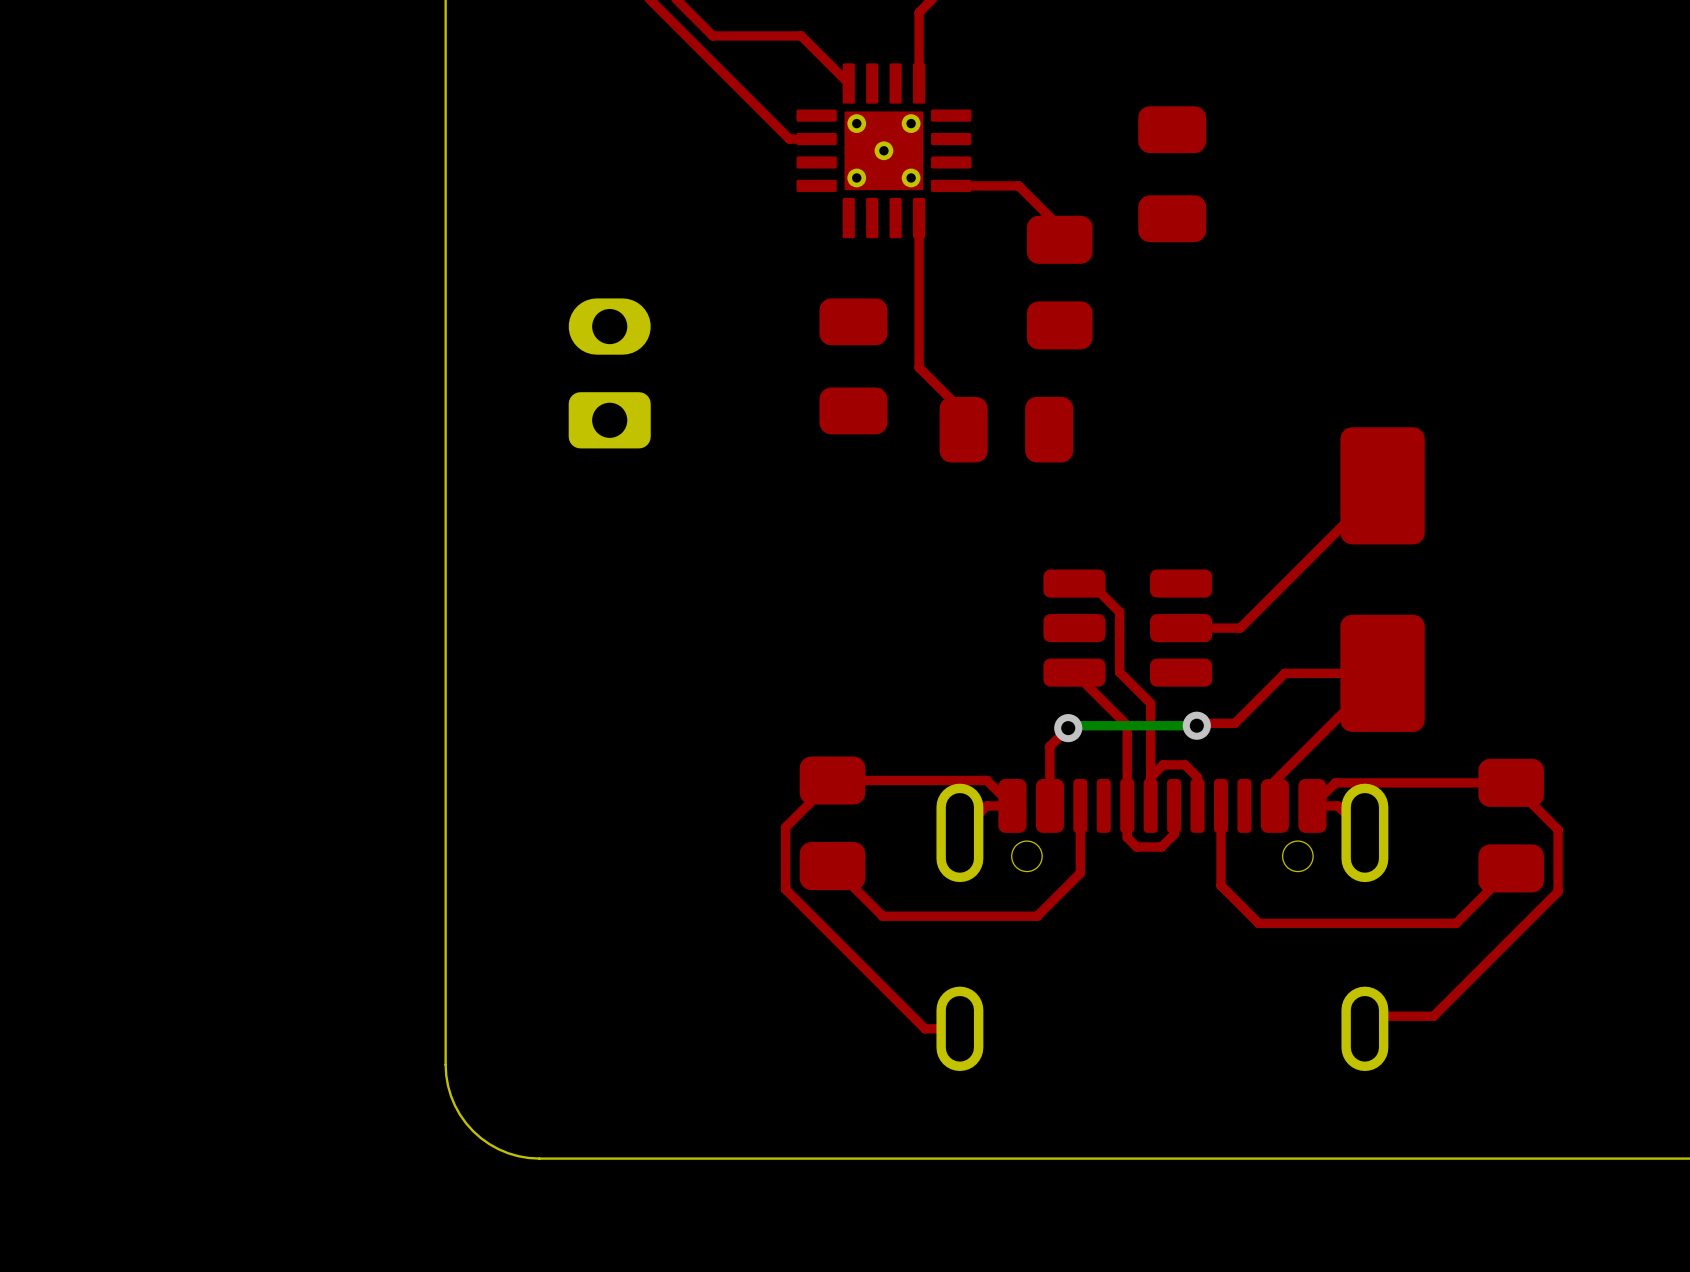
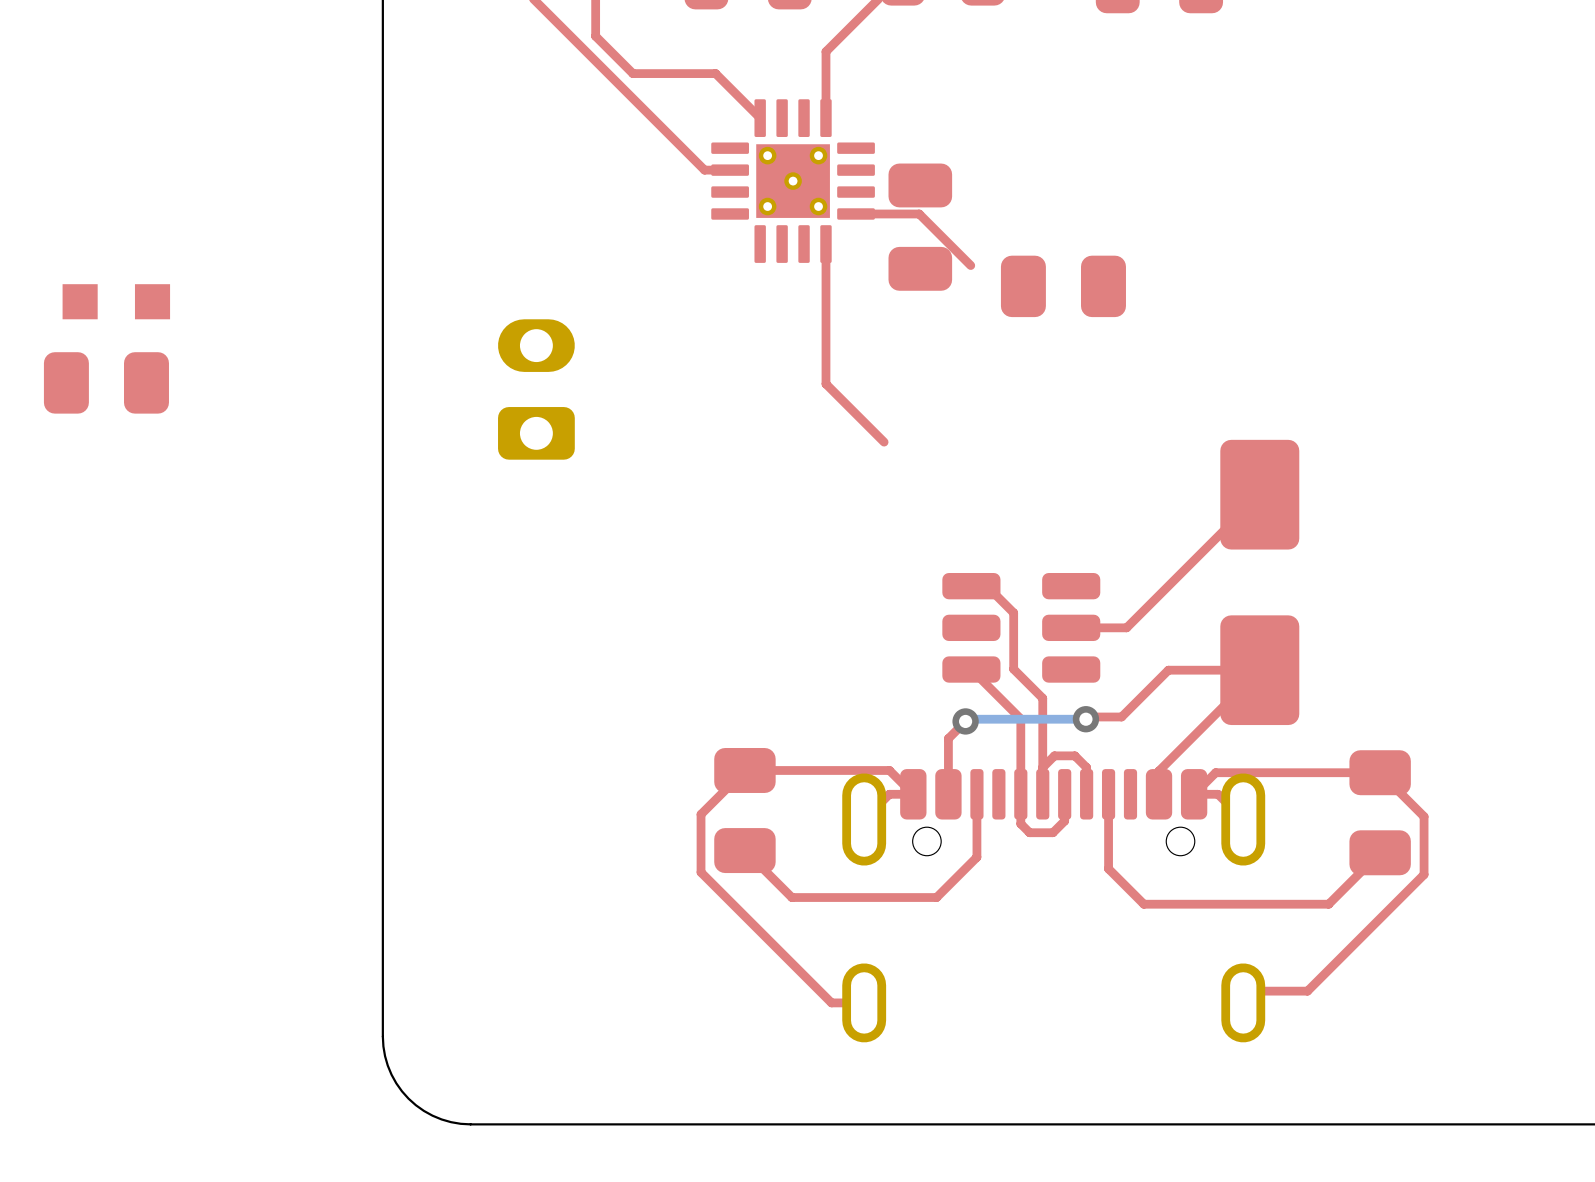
part: (1172, 174) -> none
part: none -> (920, 227)
part: none -> (116, 301)
part rotation: 0° (1059, 282) -> 90° clockwise (1063, 286)
part position: (1059, 282) -> (1063, 286)
part: none -> (106, 382)
part: (853, 366) -> none
part: (1006, 429) -> none

